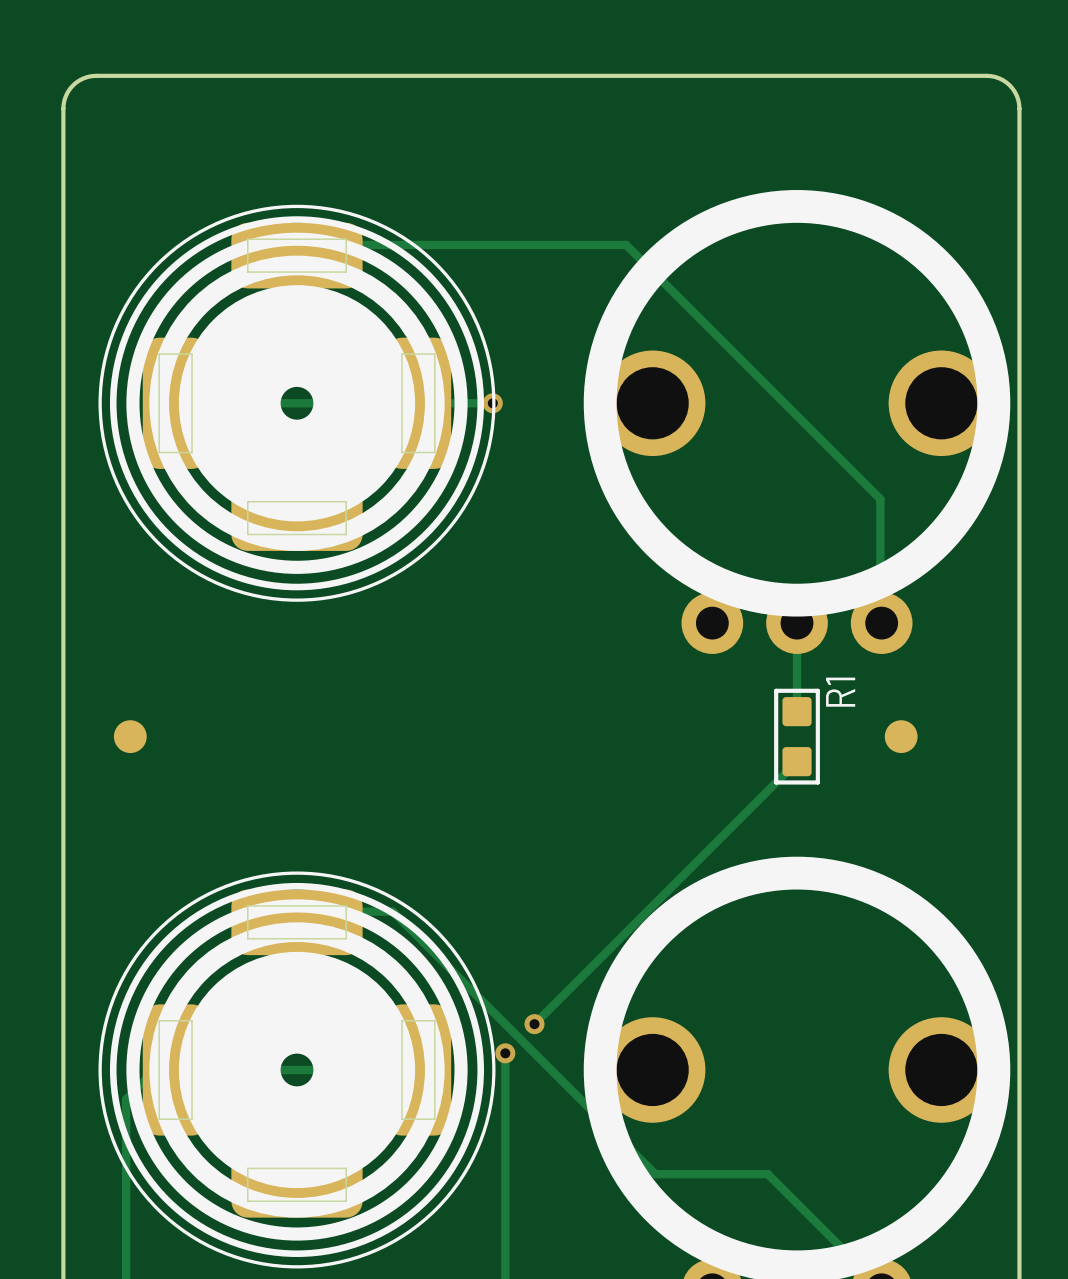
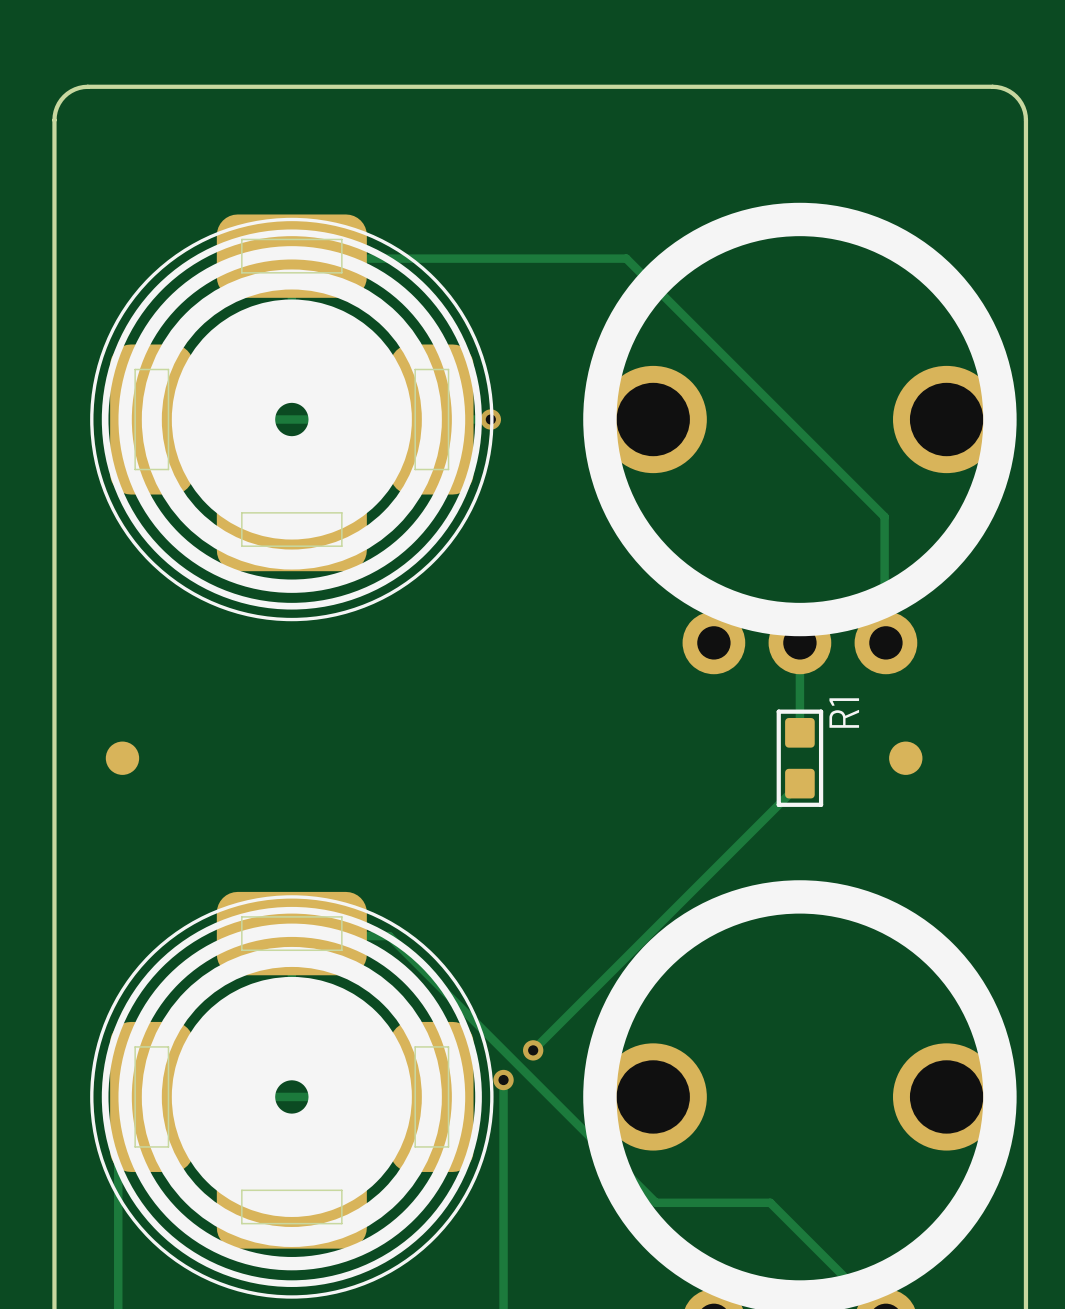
part footprint: [98, 204, 496, 602] -> [90, 214, 494, 622]
part footprint: [98, 871, 496, 1269] -> [90, 891, 494, 1299]

